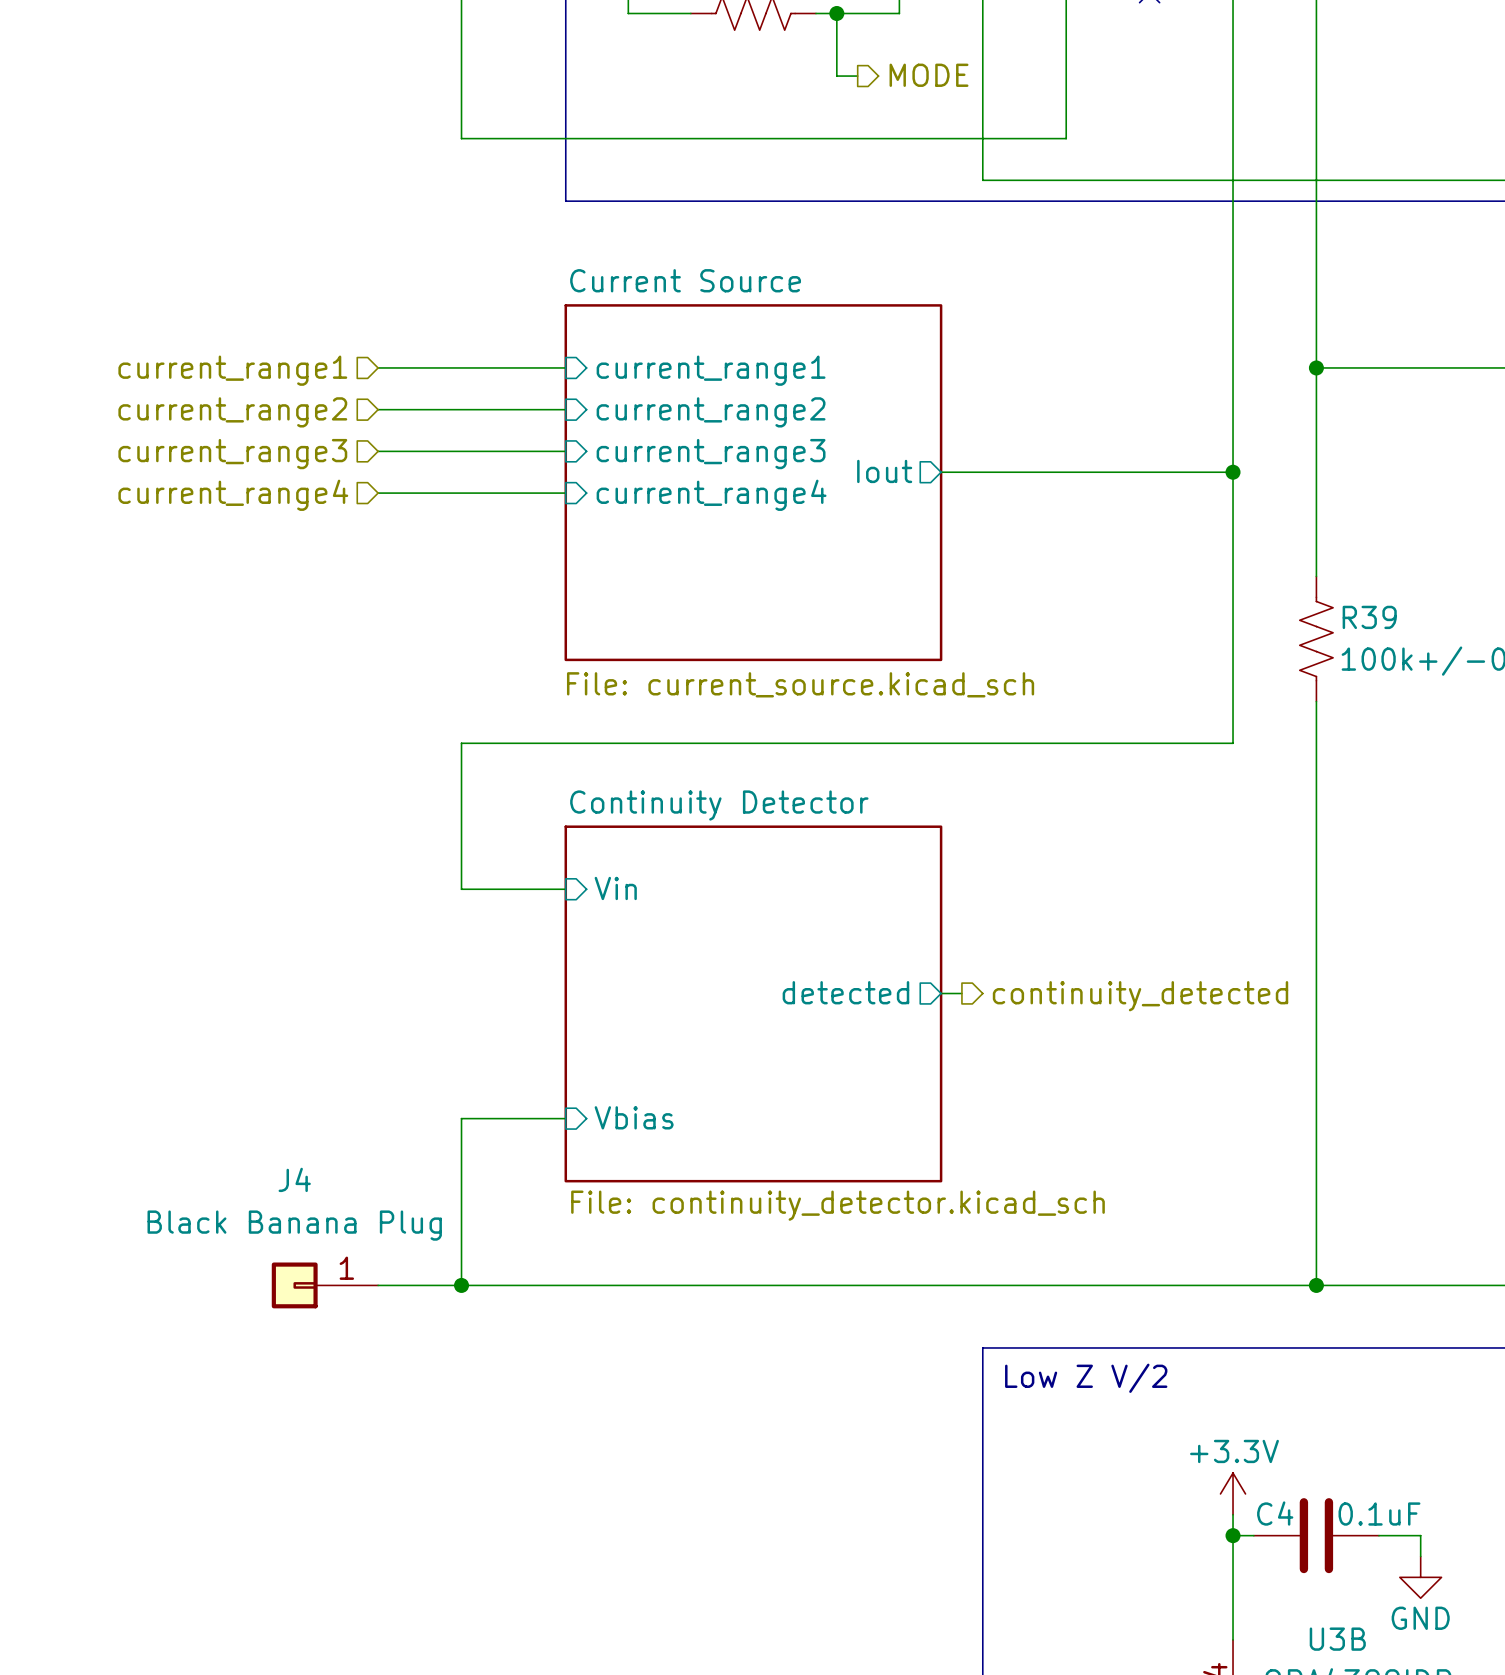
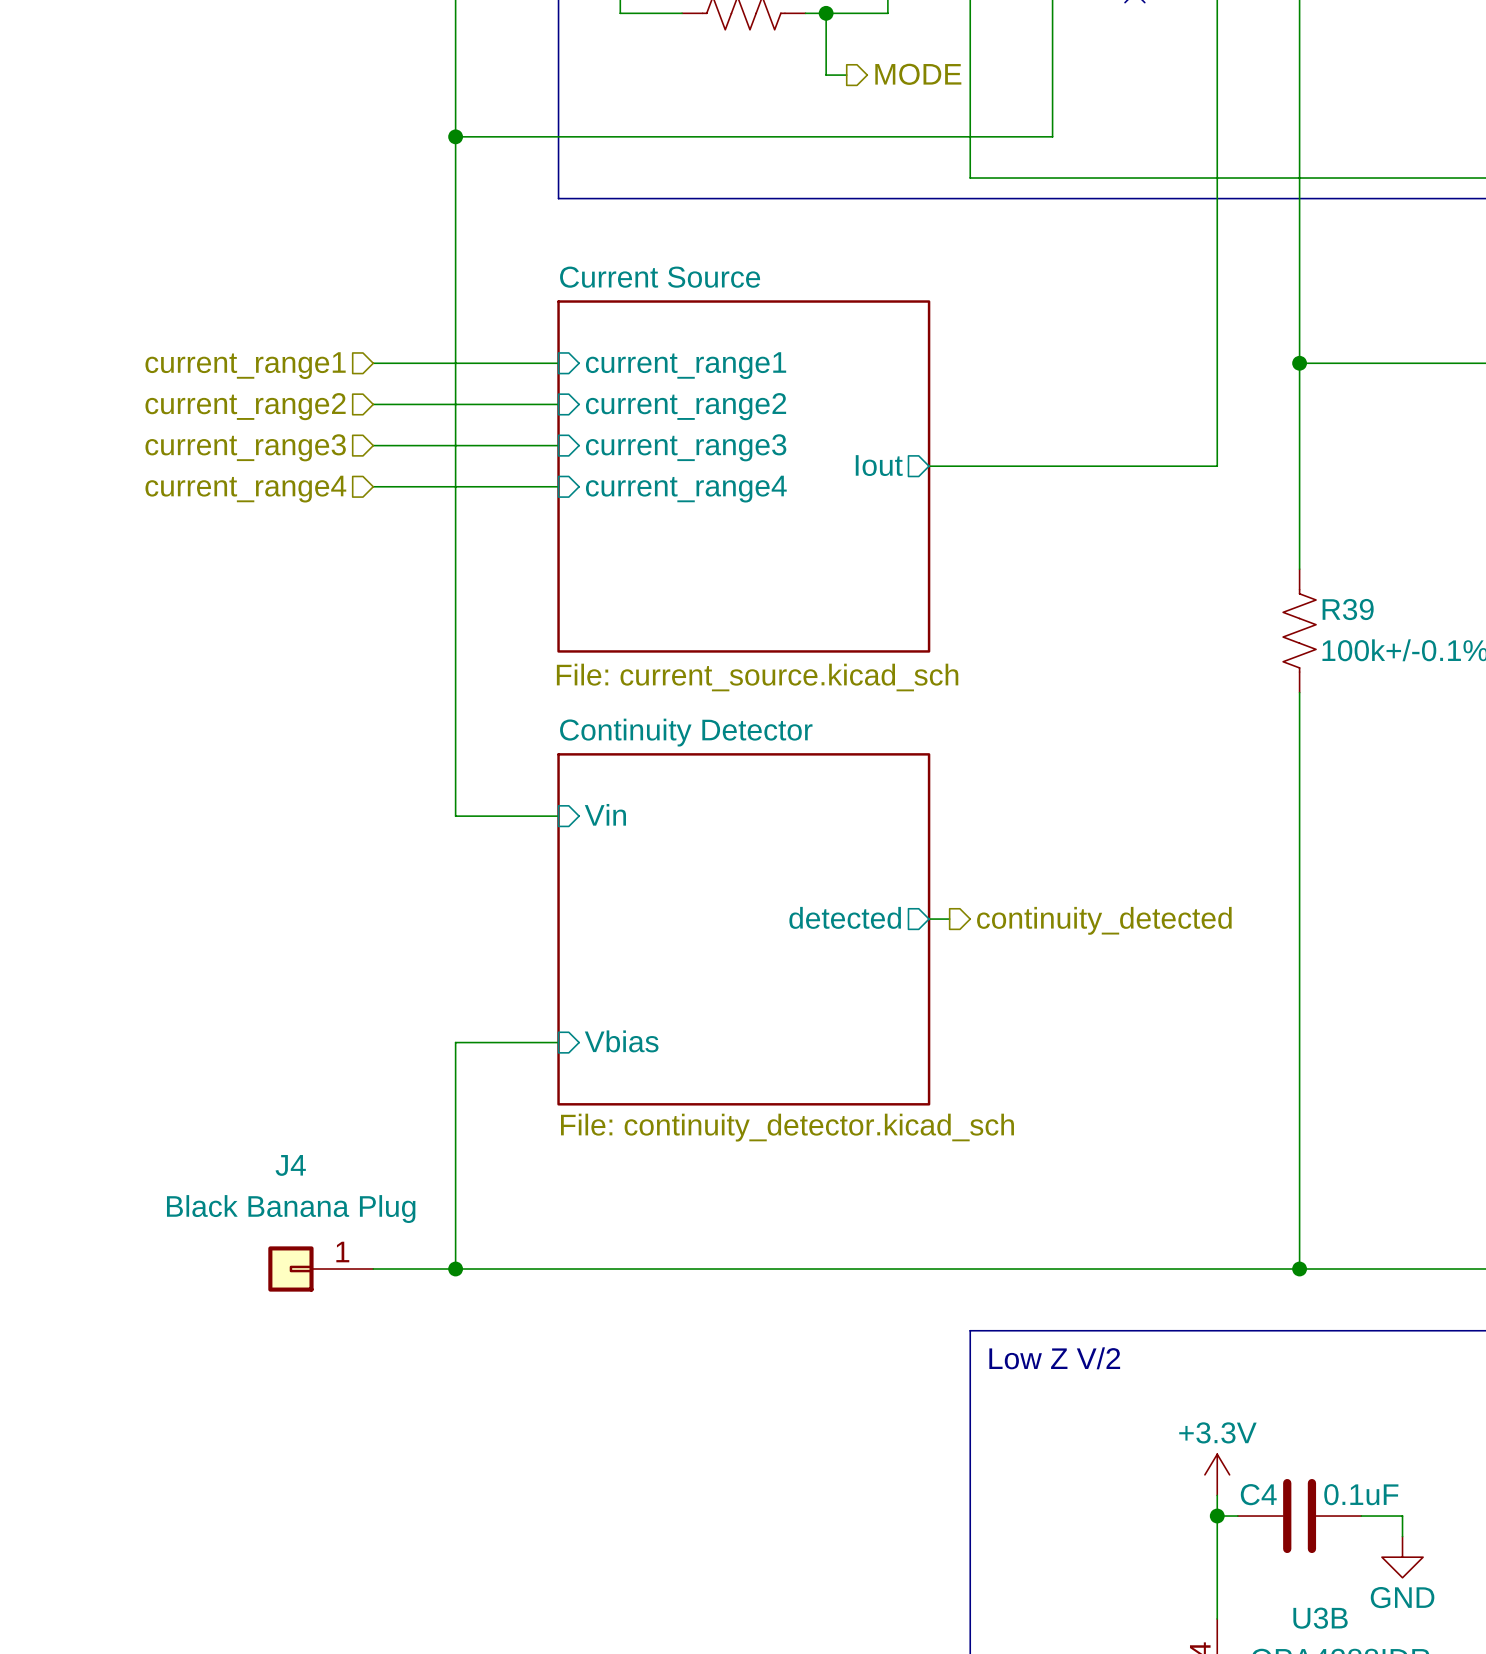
junction: none -> (455, 136)
wire: (1233, 472) (1233, 743) (461, 743) -> (455, 136) (455, 733)
junction: (1233, 472) -> none
wire: (461, 826) (461, 889) (565, 889) -> (455, 816) (558, 816)
sheet pin position: Vin (615, 888) -> Vin (605, 814)
sheet pin position: detected (845, 992) -> detected (845, 917)
wire: (941, 993) (961, 993) -> (929, 919) (949, 919)
hierarchical label position: continuity_detected (1140, 996) -> continuity_detected (1104, 920)
sheet Continuity Detector position: (753, 1003) -> (743, 929)
sheet pin position: Vbias (634, 1117) -> Vbias (621, 1041)
wire: (461, 1118) (565, 1118) -> (455, 1104) (455, 1042) (558, 1042)

